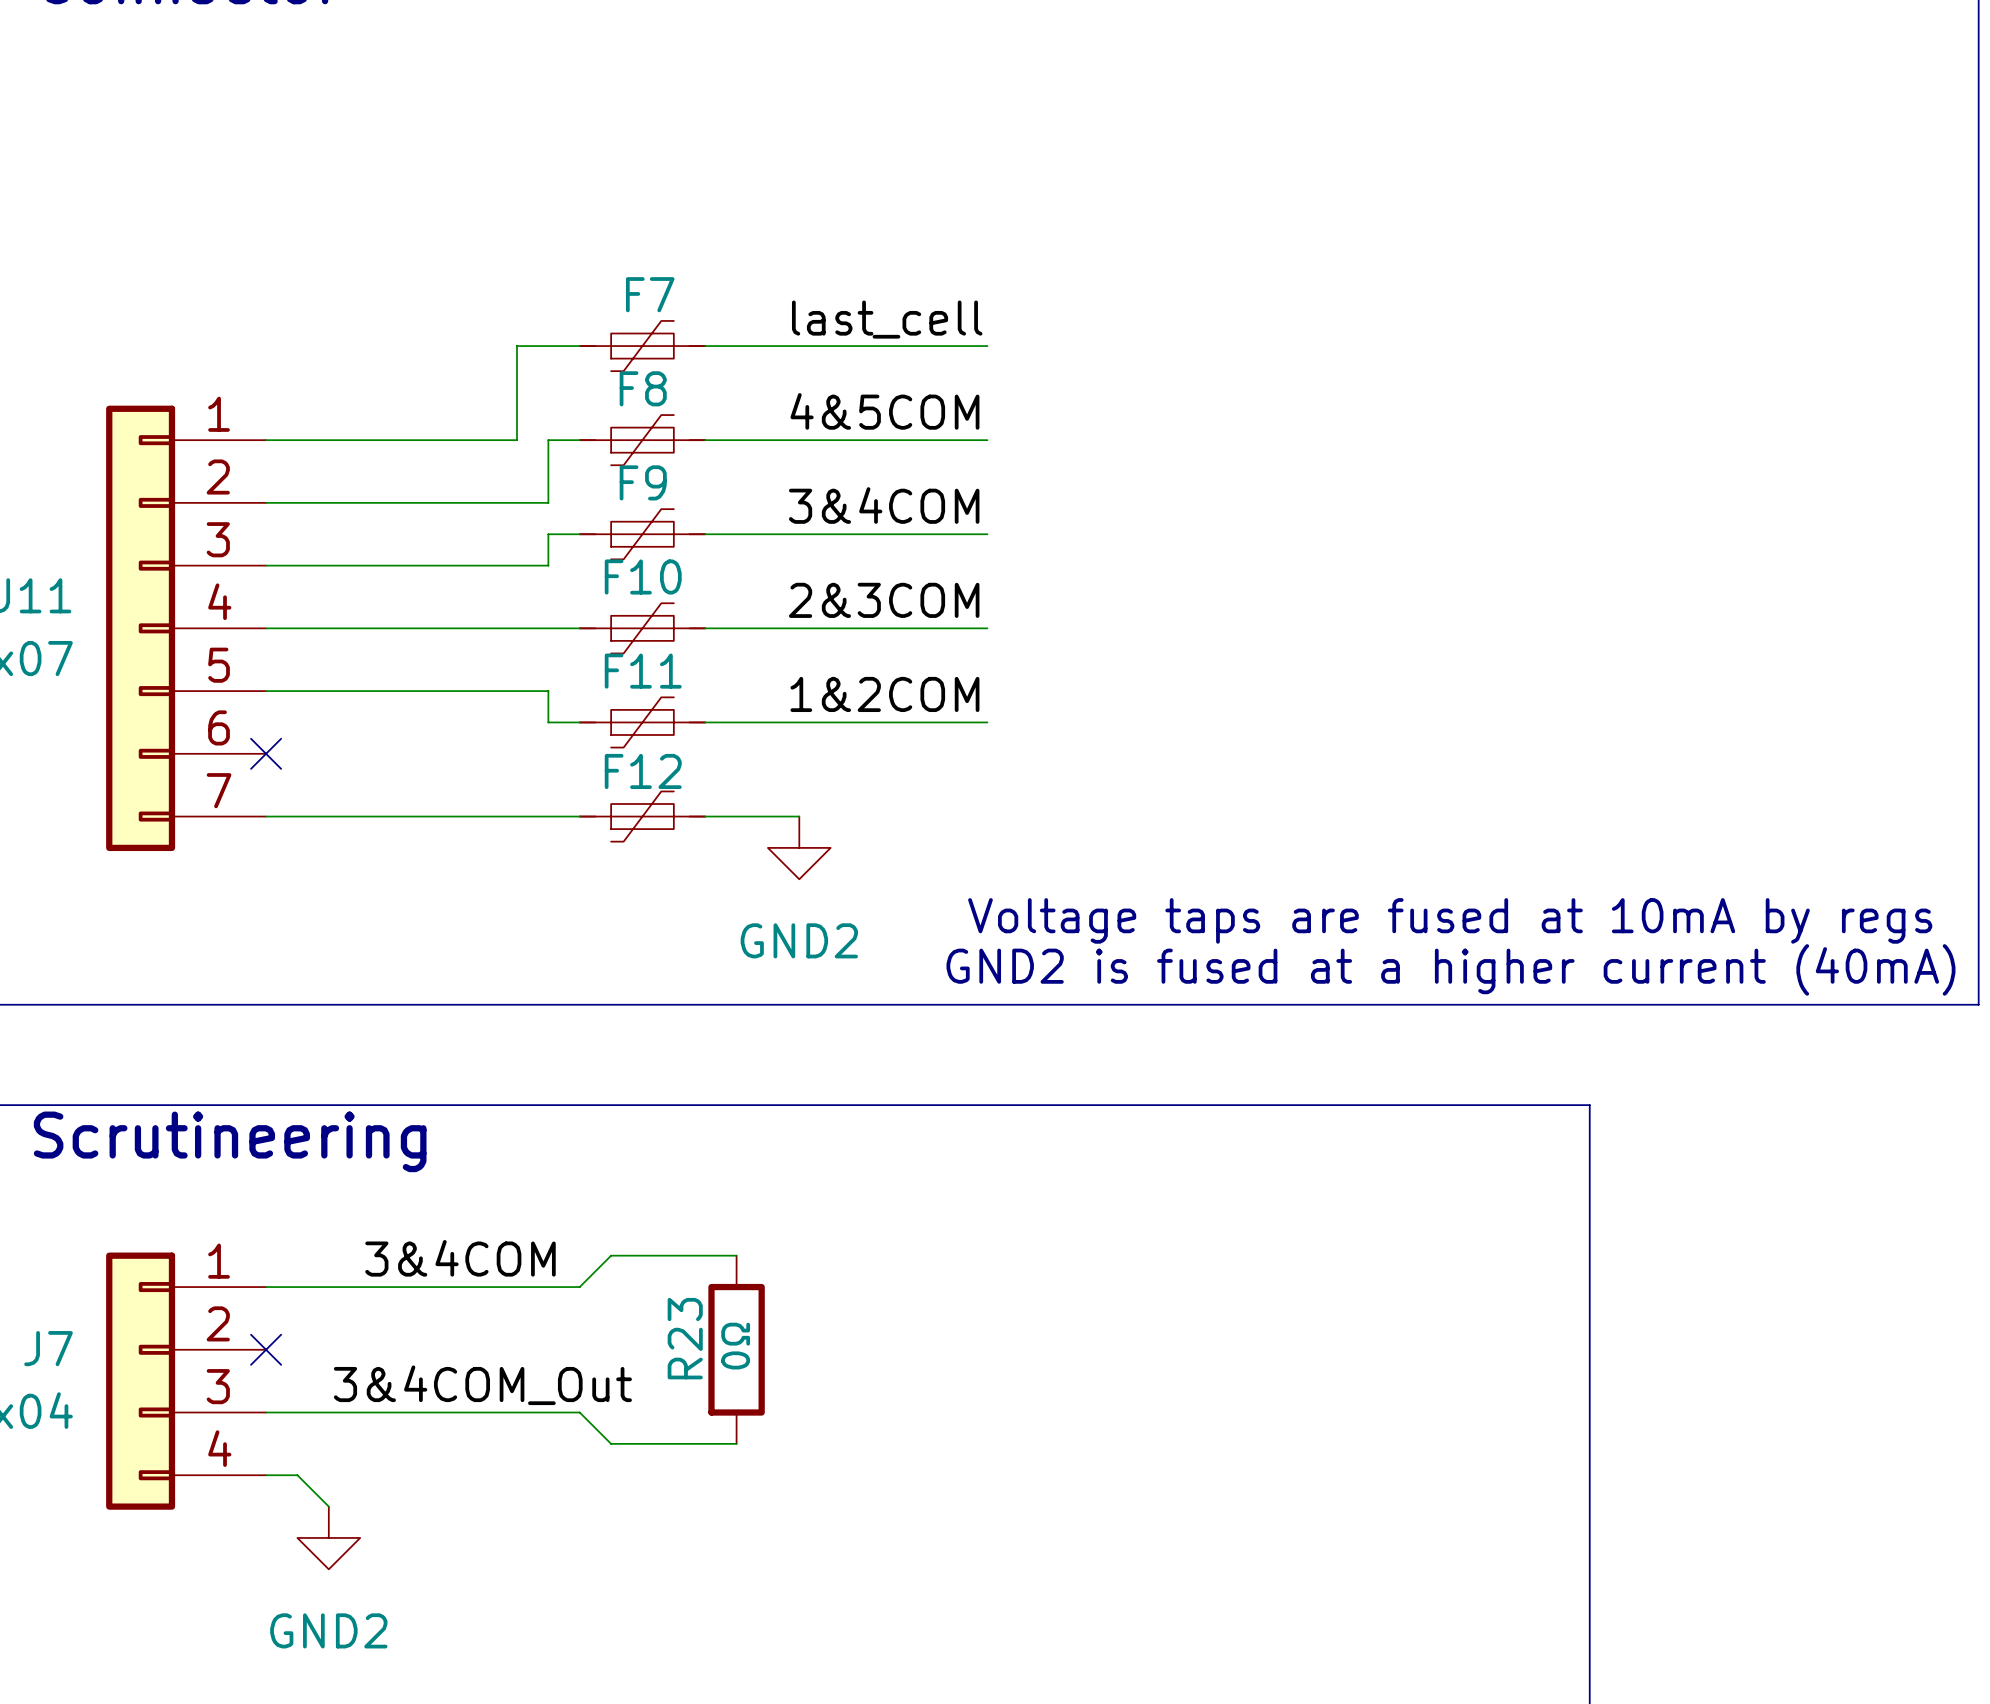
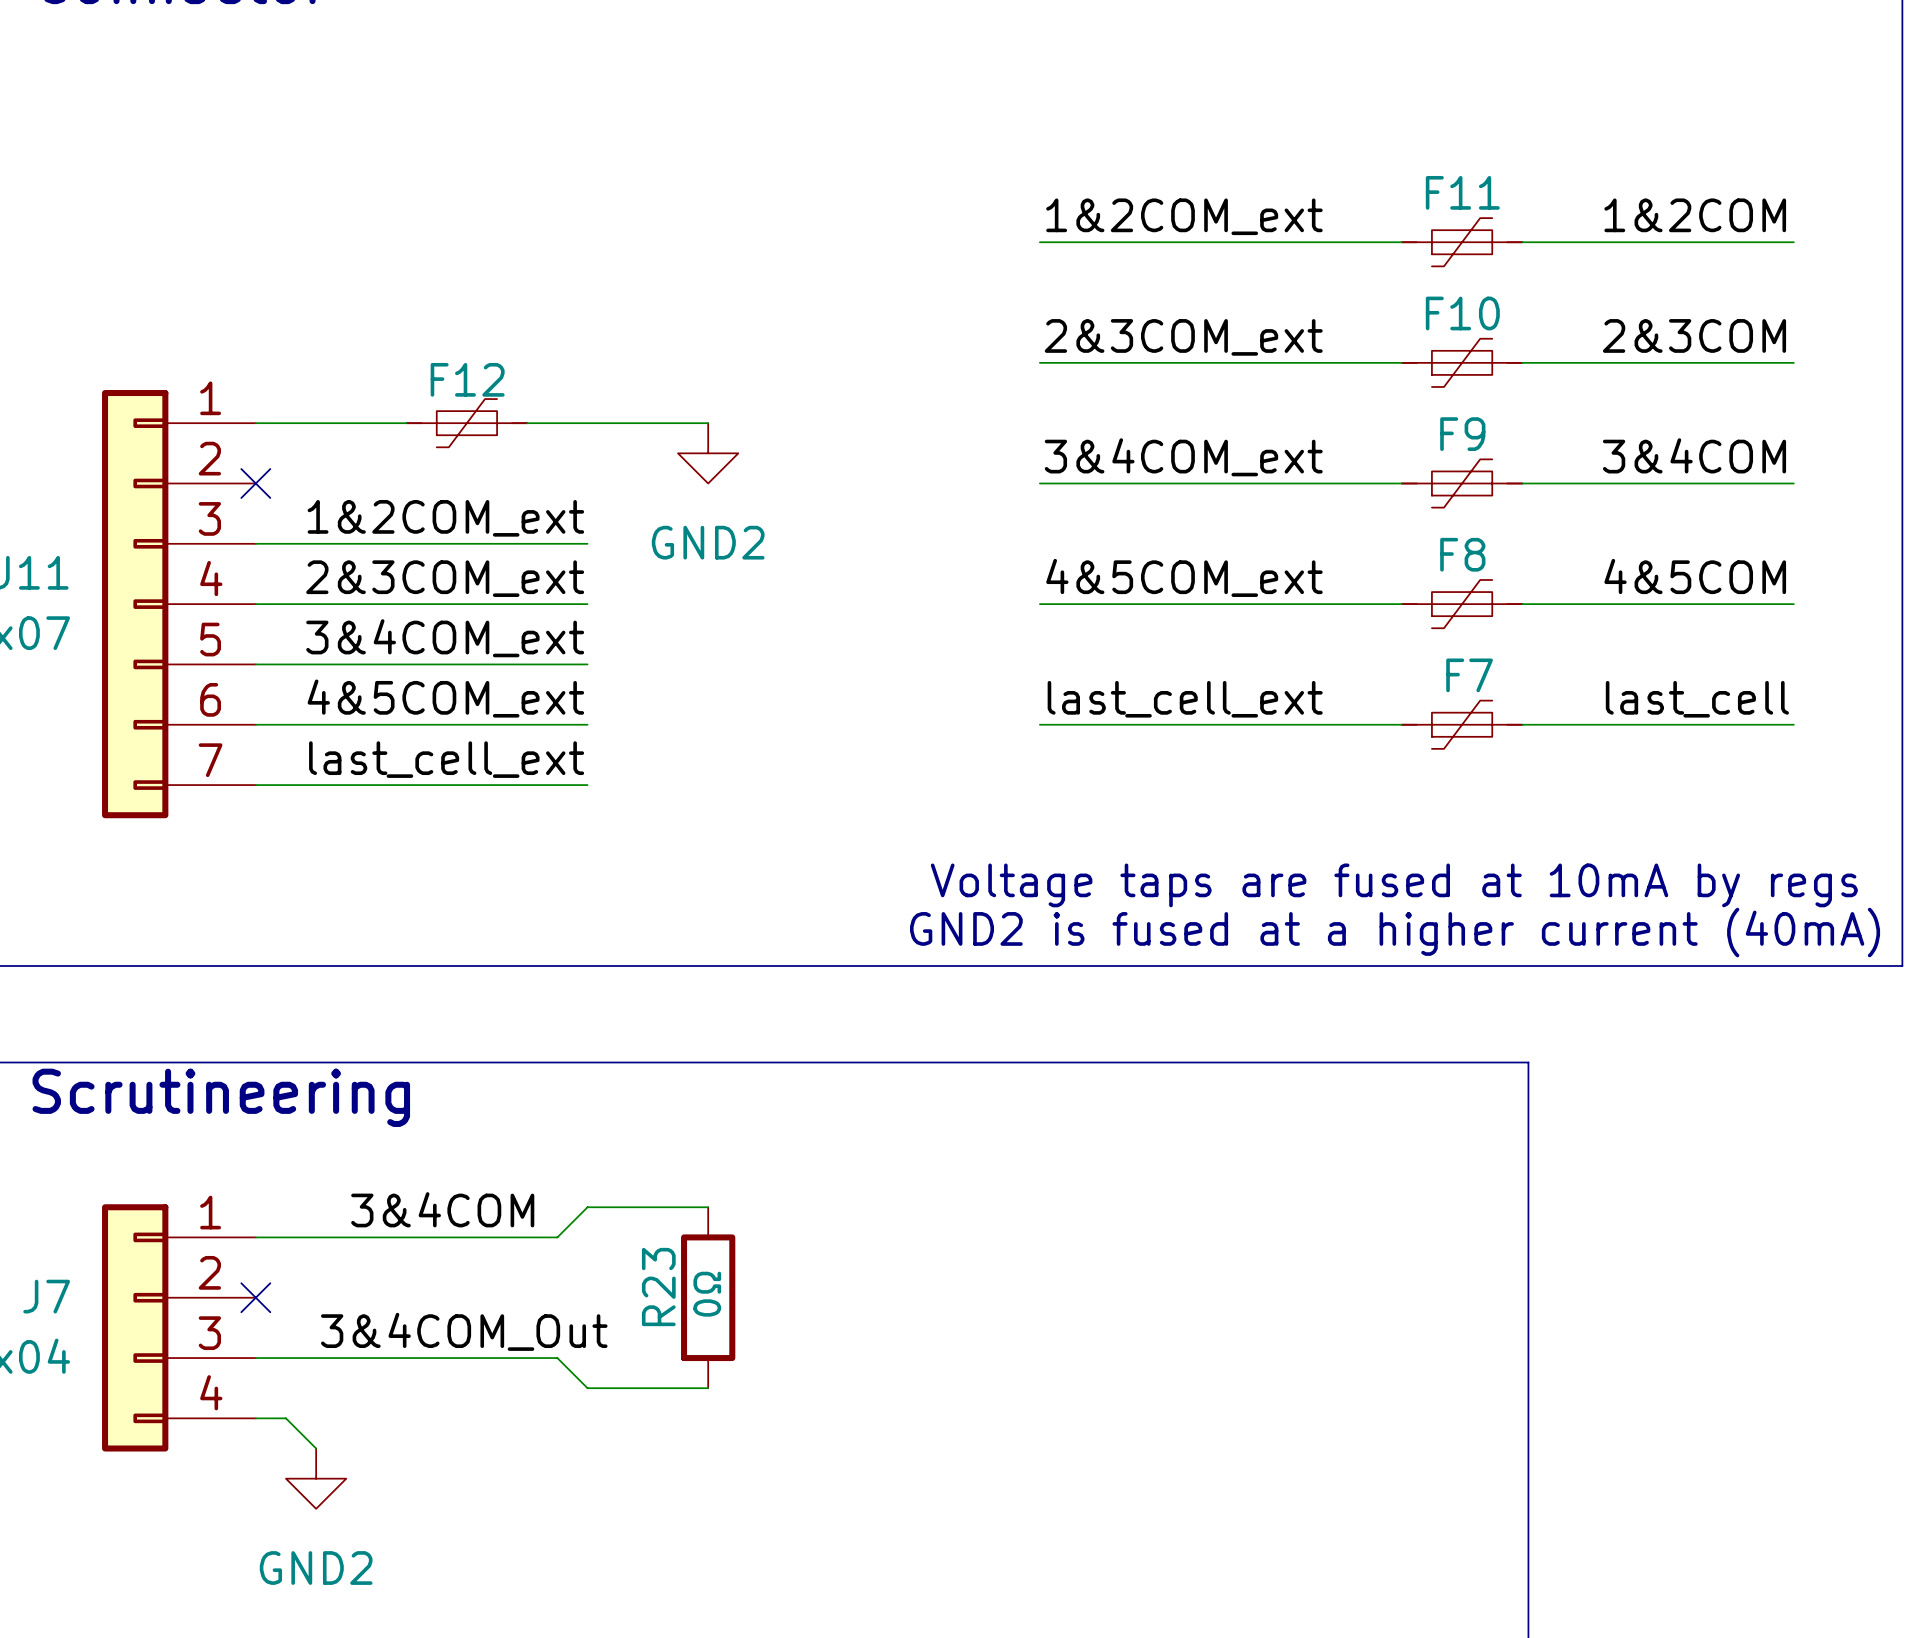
label: none -> 1&2COM (1695, 215)
label: none -> 1&2COM_ext (1184, 216)
wire: none -> (1039, 242) (1401, 242)
wire: none -> (1522, 242) (1793, 242)
label: last_cell (887, 319) -> none
wire: (579, 346) (517, 346) (517, 440) (422, 440) -> none
F7 position: (642, 346) -> (1462, 724)
wire: (705, 346) (987, 346) -> none
label: none -> 2&3COM (1694, 335)
label: none -> 2&3COM_ext (1183, 337)
wire: none -> (1039, 362) (1401, 362)
wire: none -> (1522, 362) (1793, 362)
label: 4&5COM (884, 411) -> none
wire: (548, 440) (548, 502) (266, 502) -> none
F8 position: (642, 440) -> (1462, 604)
wire: (736, 440) (987, 440) -> none
label: none -> 3&4COM (1694, 455)
label: none -> 3&4COM_ext (1183, 457)
no-connect mark: none -> (255, 483)
wire: none -> (1039, 483) (1401, 483)
wire: none -> (1522, 483) (1793, 483)
label: 3&4COM (884, 505) -> none
wire: (579, 534) (548, 534) (548, 565) -> (587, 543) (527, 543)
F9 position: (642, 534) -> (1462, 483)
wire: (705, 534) (987, 534) -> none
label: none -> 1&2COM_ext (445, 518)
label: none -> 4&5COM (1695, 576)
label: 2&3COM (884, 600) -> none
label: none -> 2&3COM_ext (445, 578)
label: none -> 4&5COM_ext (1184, 577)
F10 position: (642, 628) -> (1462, 362)
wire: (705, 628) (987, 628) -> none
wire: none -> (1039, 604) (1401, 604)
wire: none -> (1522, 604) (1793, 604)
label: none -> 3&4COM_ext (445, 638)
wire: (548, 691) (548, 722) (579, 722) -> (527, 664) (587, 664)
label: 1&2COM (884, 694) -> none
F11 position: (642, 722) -> (1462, 242)
wire: (705, 722) (987, 722) -> none
label: none -> 4&5COM_ext (445, 698)
label: none -> last_cell_ext (1185, 699)
label: none -> last_cell (1697, 699)
wire: none -> (255, 724) (587, 724)
no-connect mark: (266, 753) -> none
wire: none -> (1039, 724) (1401, 724)
wire: none -> (1522, 724) (1793, 724)
label: none -> last_cell_ext (446, 759)
F12 position: (642, 816) -> (466, 423)
wire: (705, 816) (799, 816) -> none
power symbol position: GND2 (799, 847) -> GND2 (708, 453)

